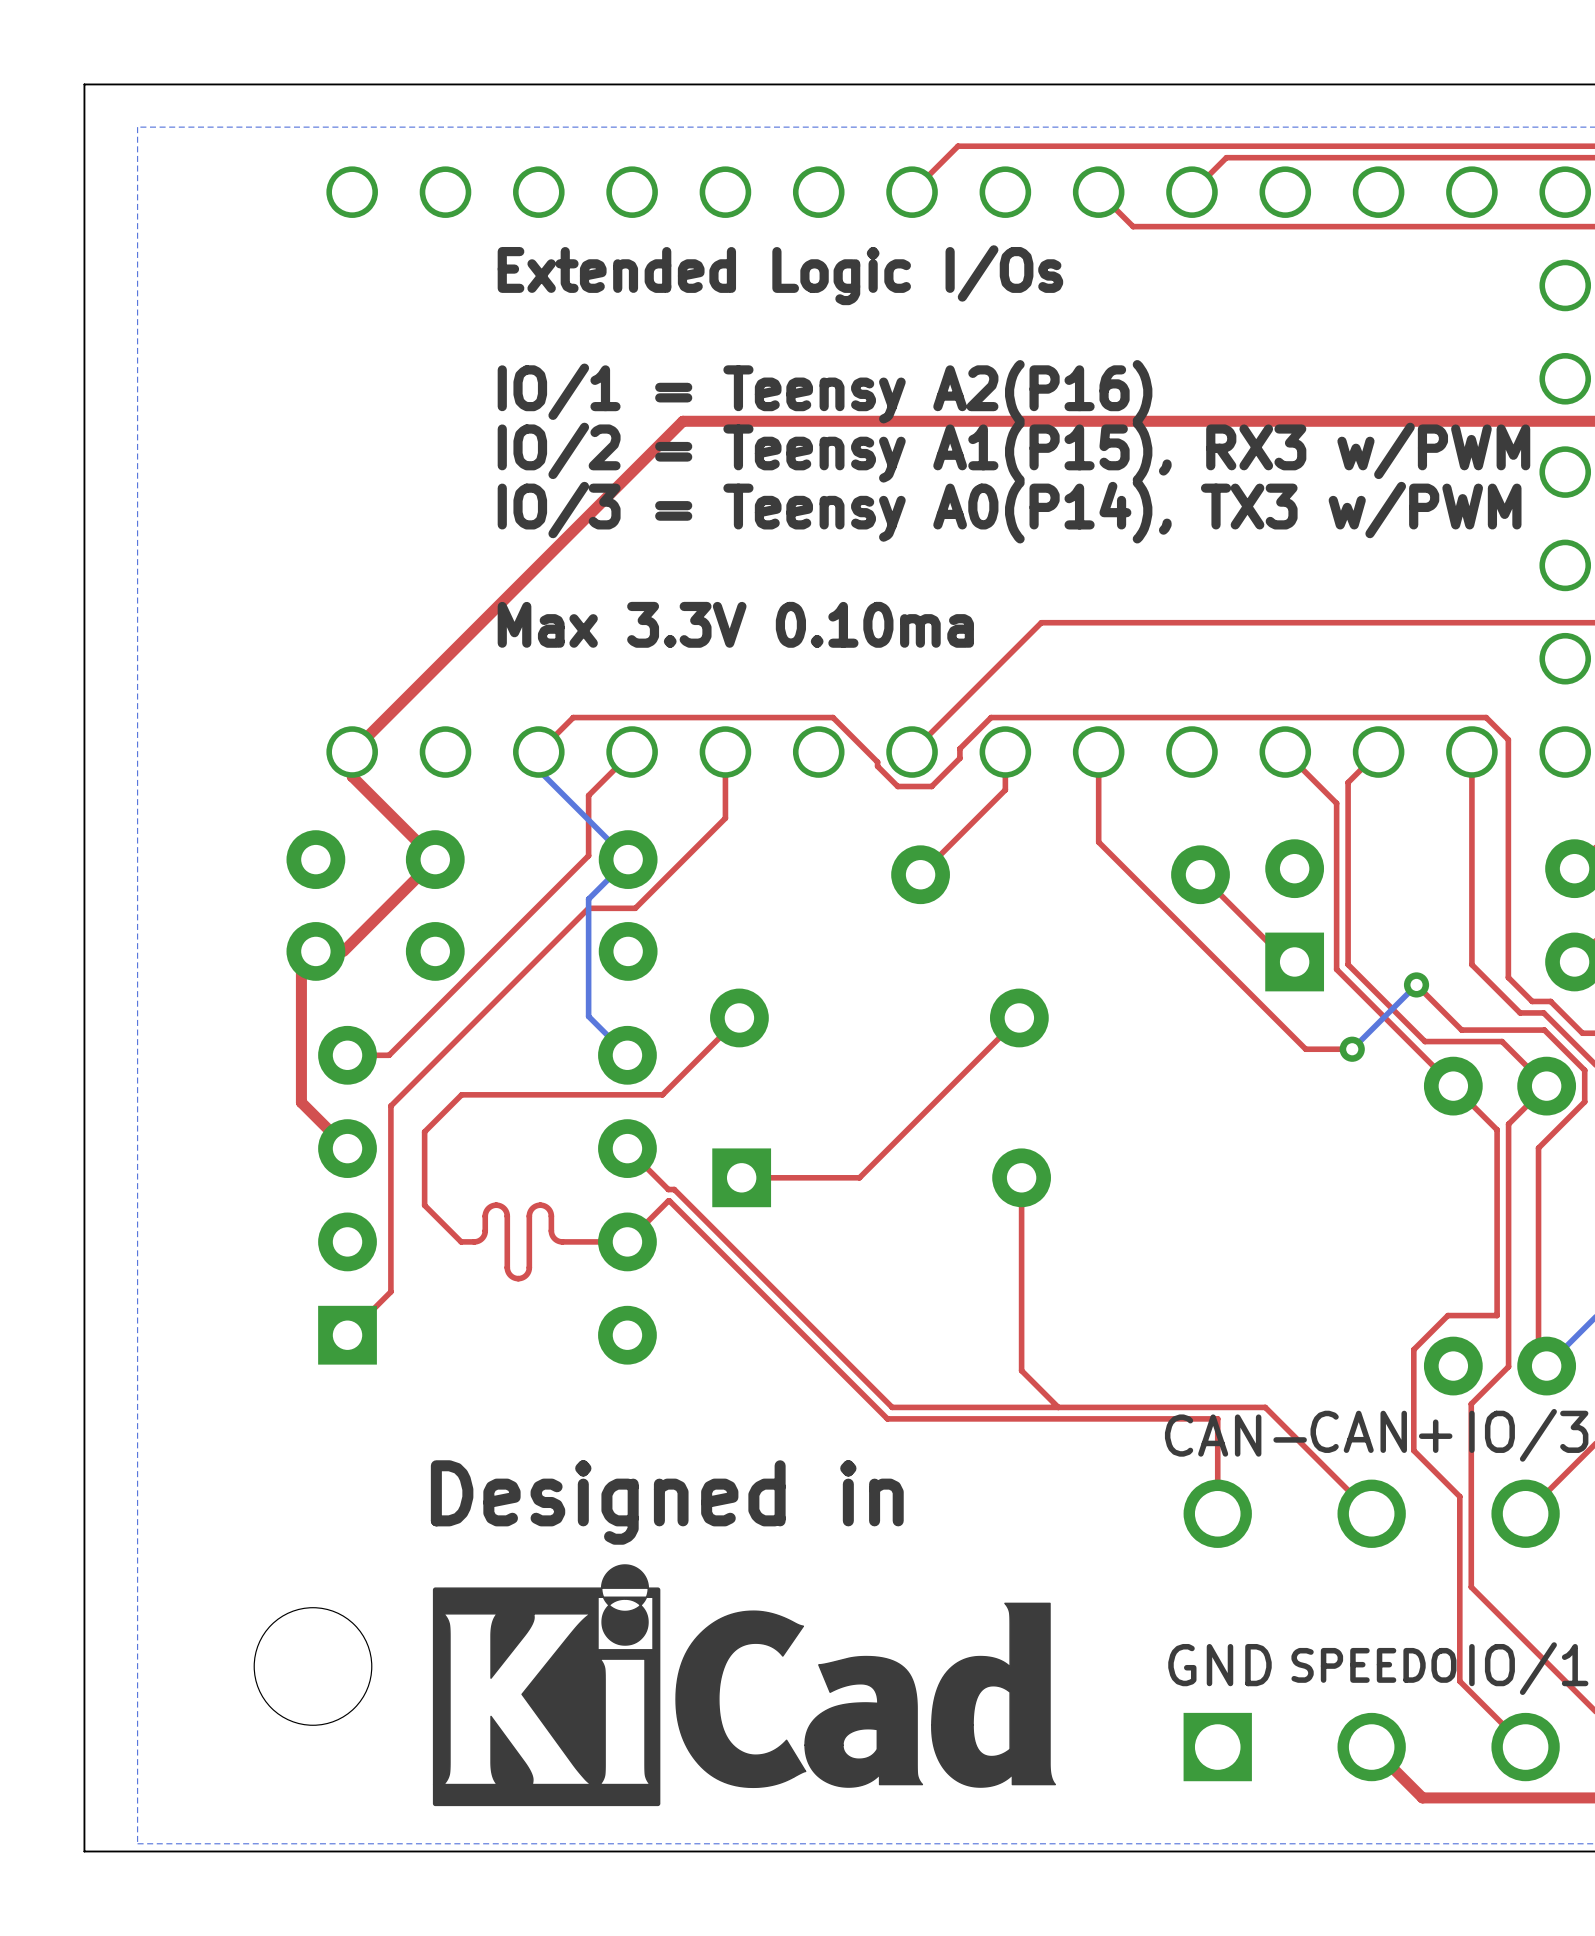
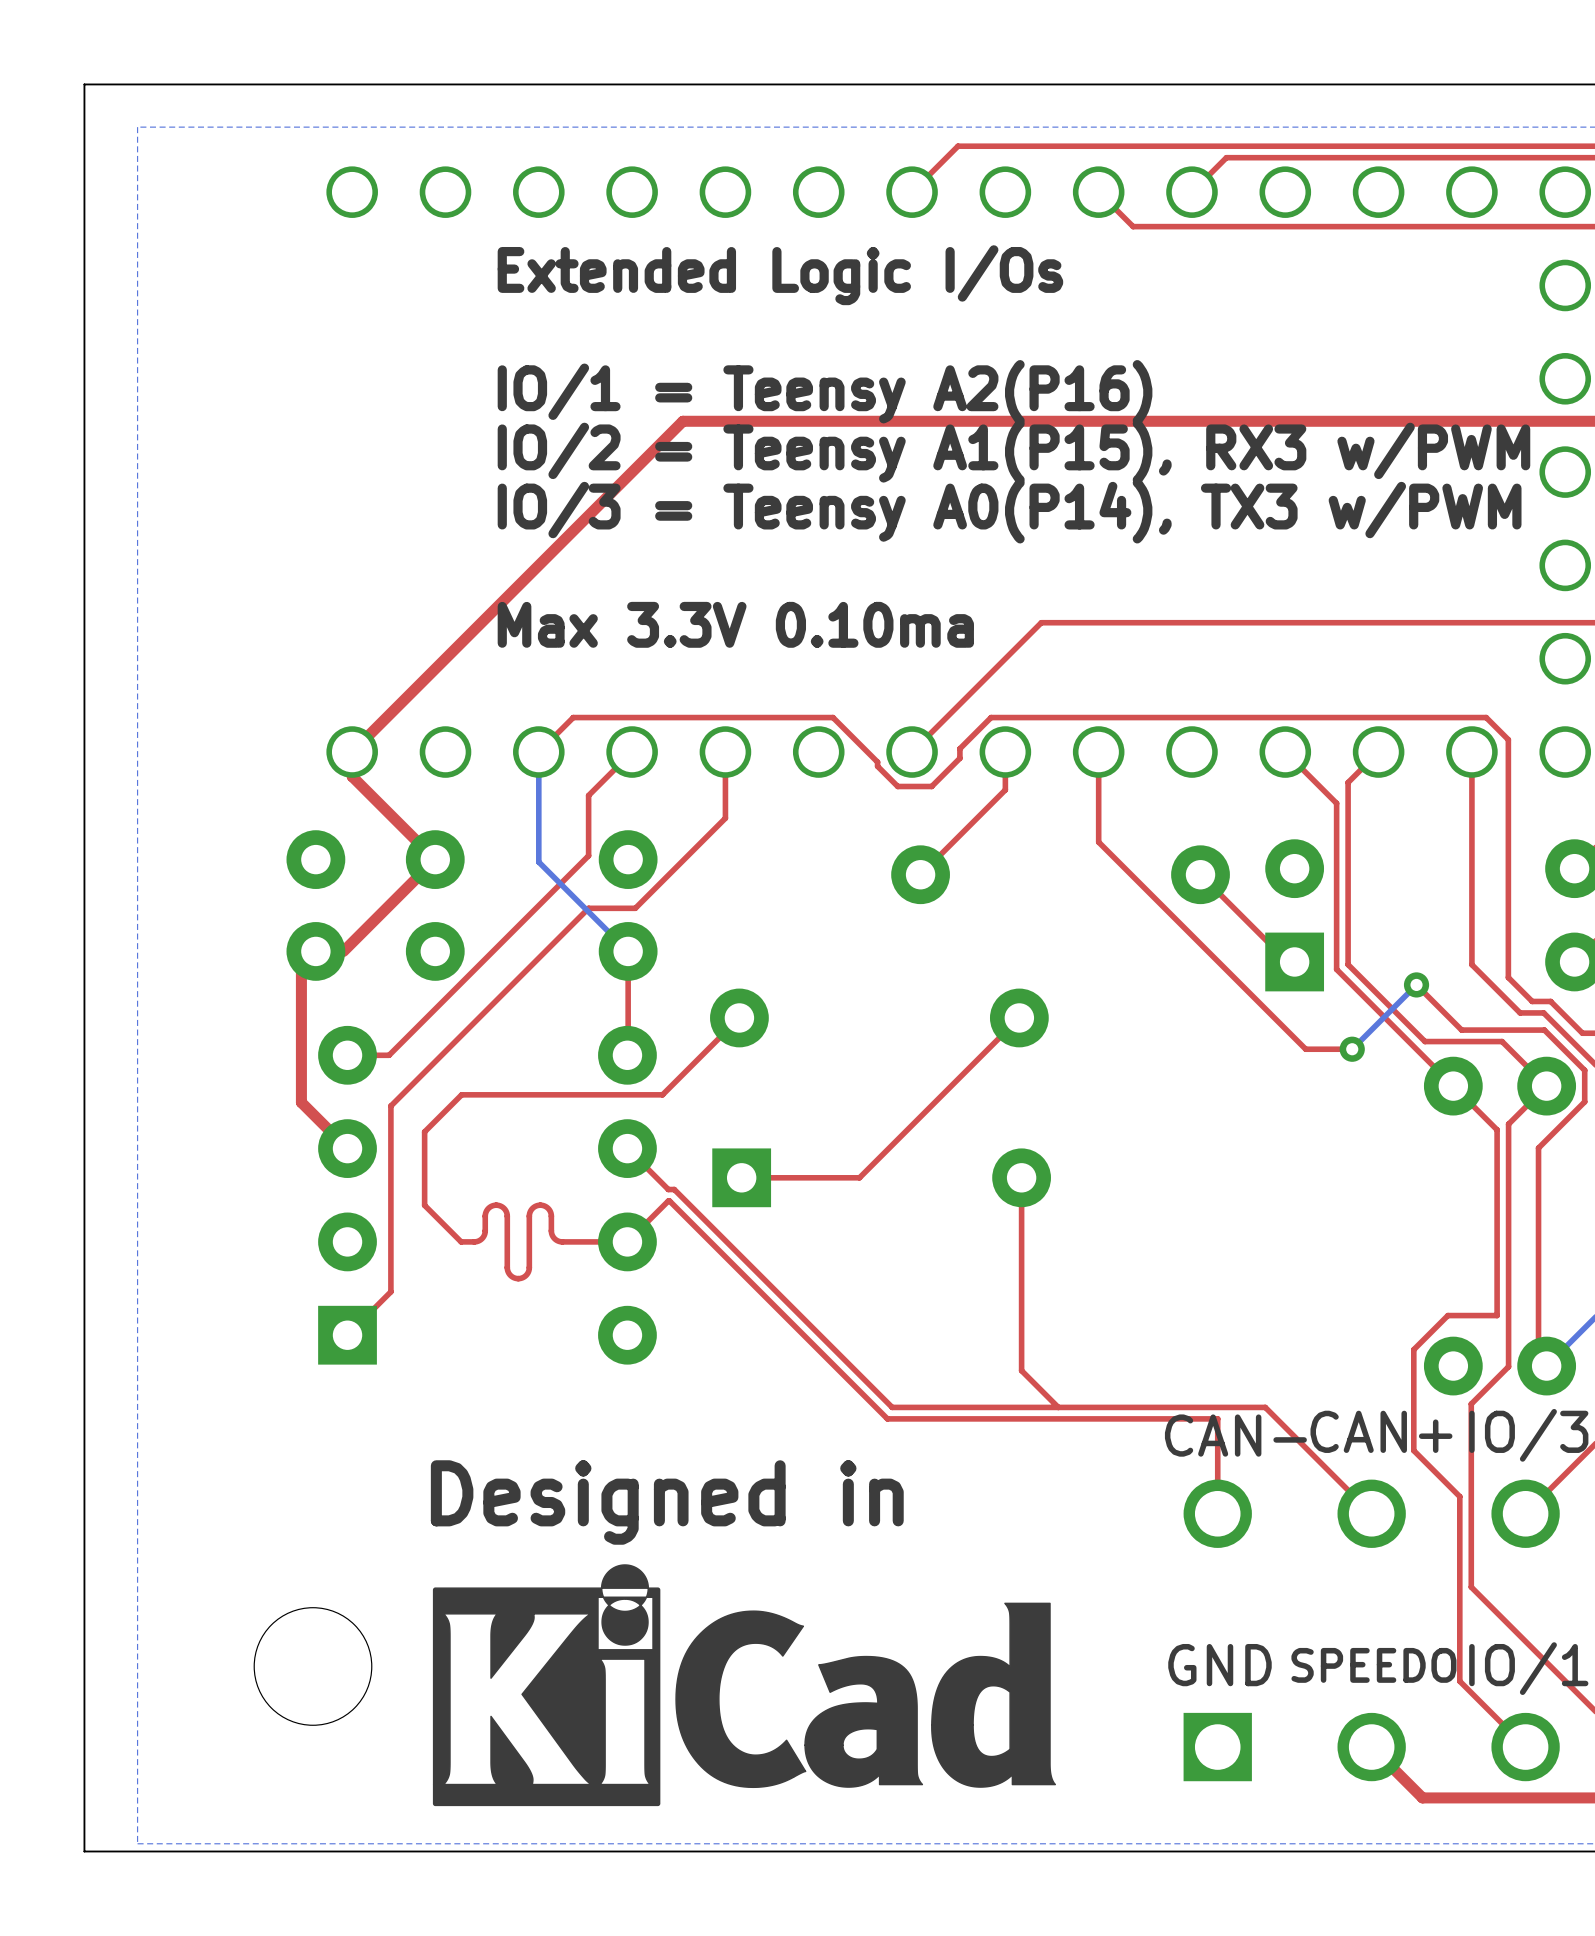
bottom track: (538, 770) (628, 859) (588, 899) (588, 1016) (627, 1055) -> (538, 770) (538, 862) (628, 951)
top track: none -> (628, 951) (628, 1054)

